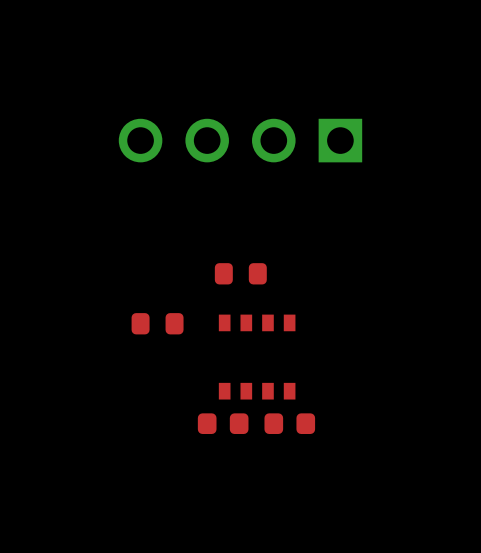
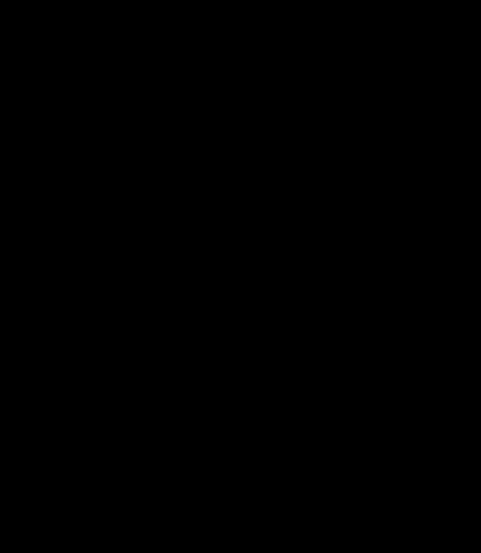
part: (240, 140) -> none
part: (240, 273) -> none
part: (157, 323) -> none
part: (257, 357) -> none
part: (223, 423) -> none
part: (289, 423) -> none

